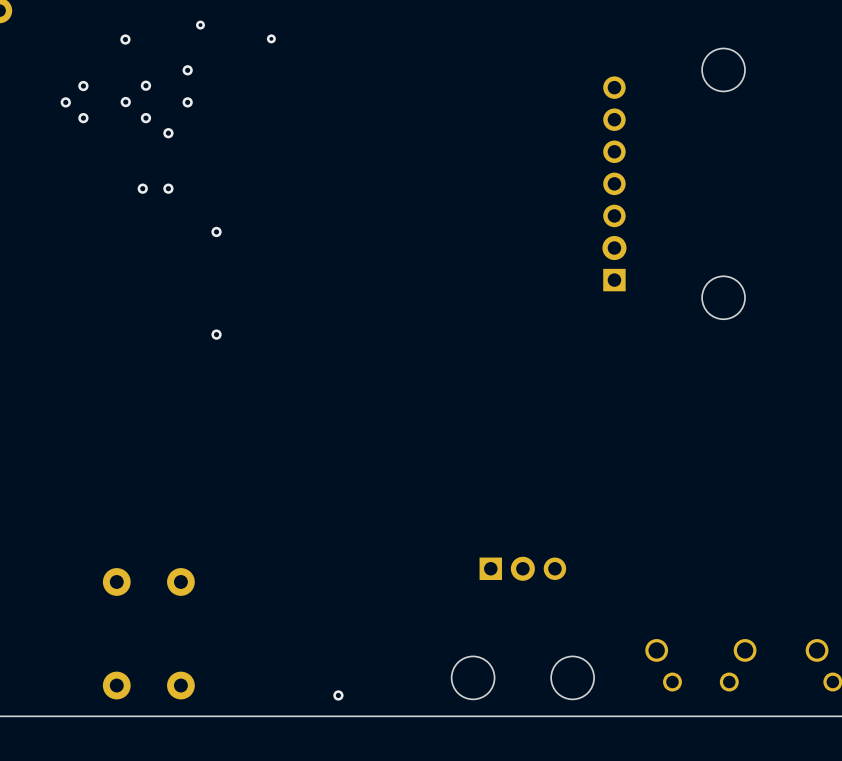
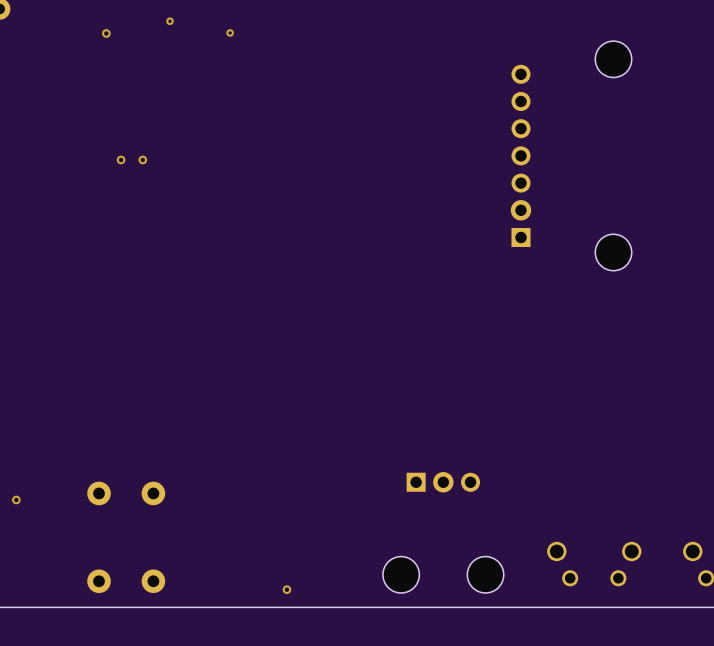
via: (187, 70) -> none
via: (145, 85) -> none
via: (83, 86) -> none
via: (65, 102) -> none
via: (125, 102) -> none
via: (187, 102) -> none
via: (83, 118) -> none
via: (145, 118) -> none
via: (168, 133) -> none
via: (216, 231) -> none
via: (216, 334) -> none
via: none -> (16, 499)

